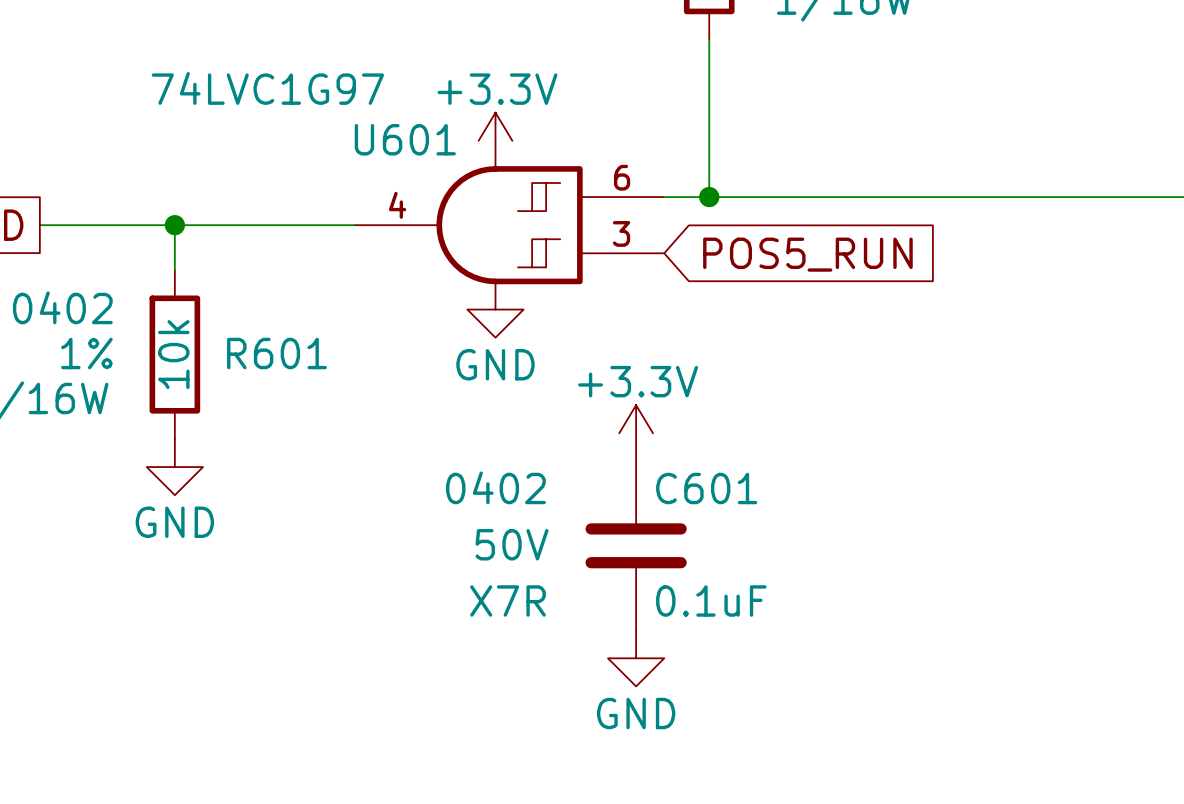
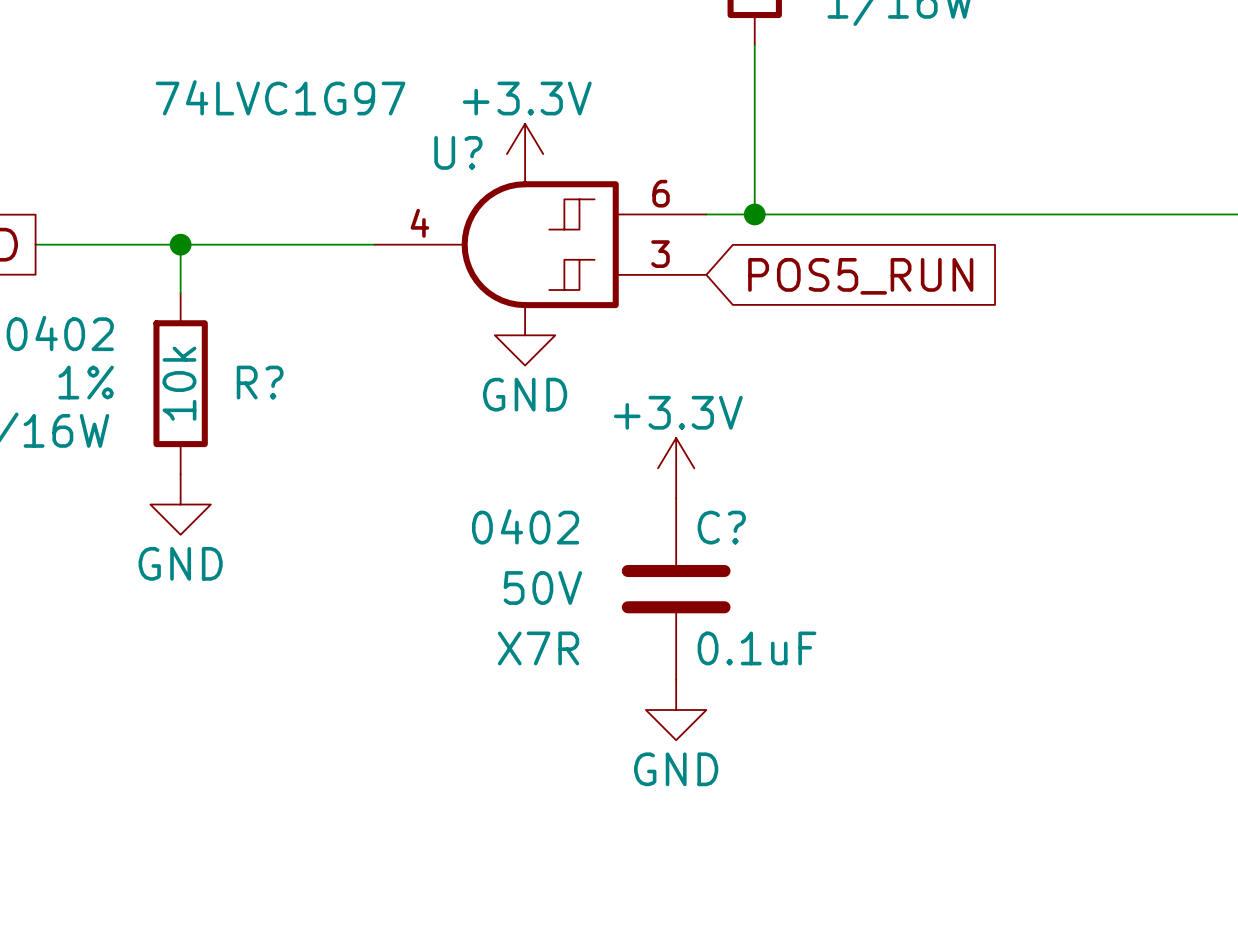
U601 name: U601 (405, 139) -> U? (458, 152)
R601 name: R601 (277, 353) -> R? (260, 382)
C601 name: C601 (706, 488) -> C? (721, 527)

